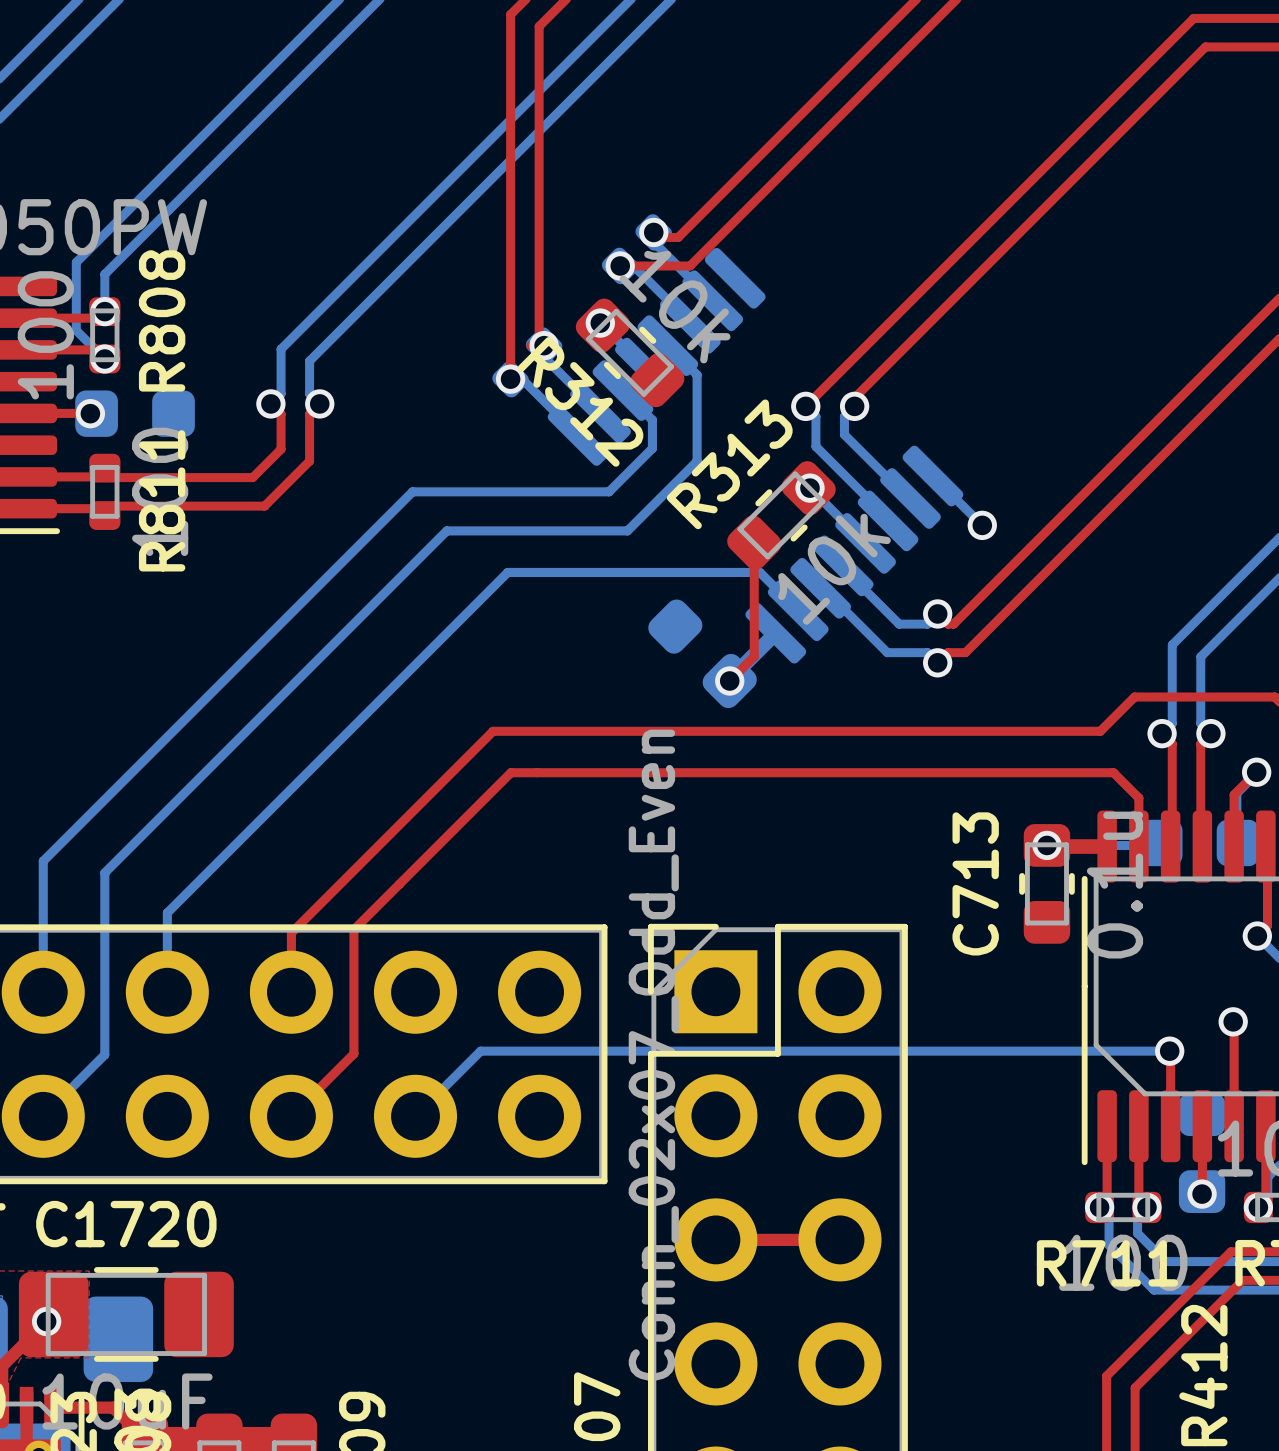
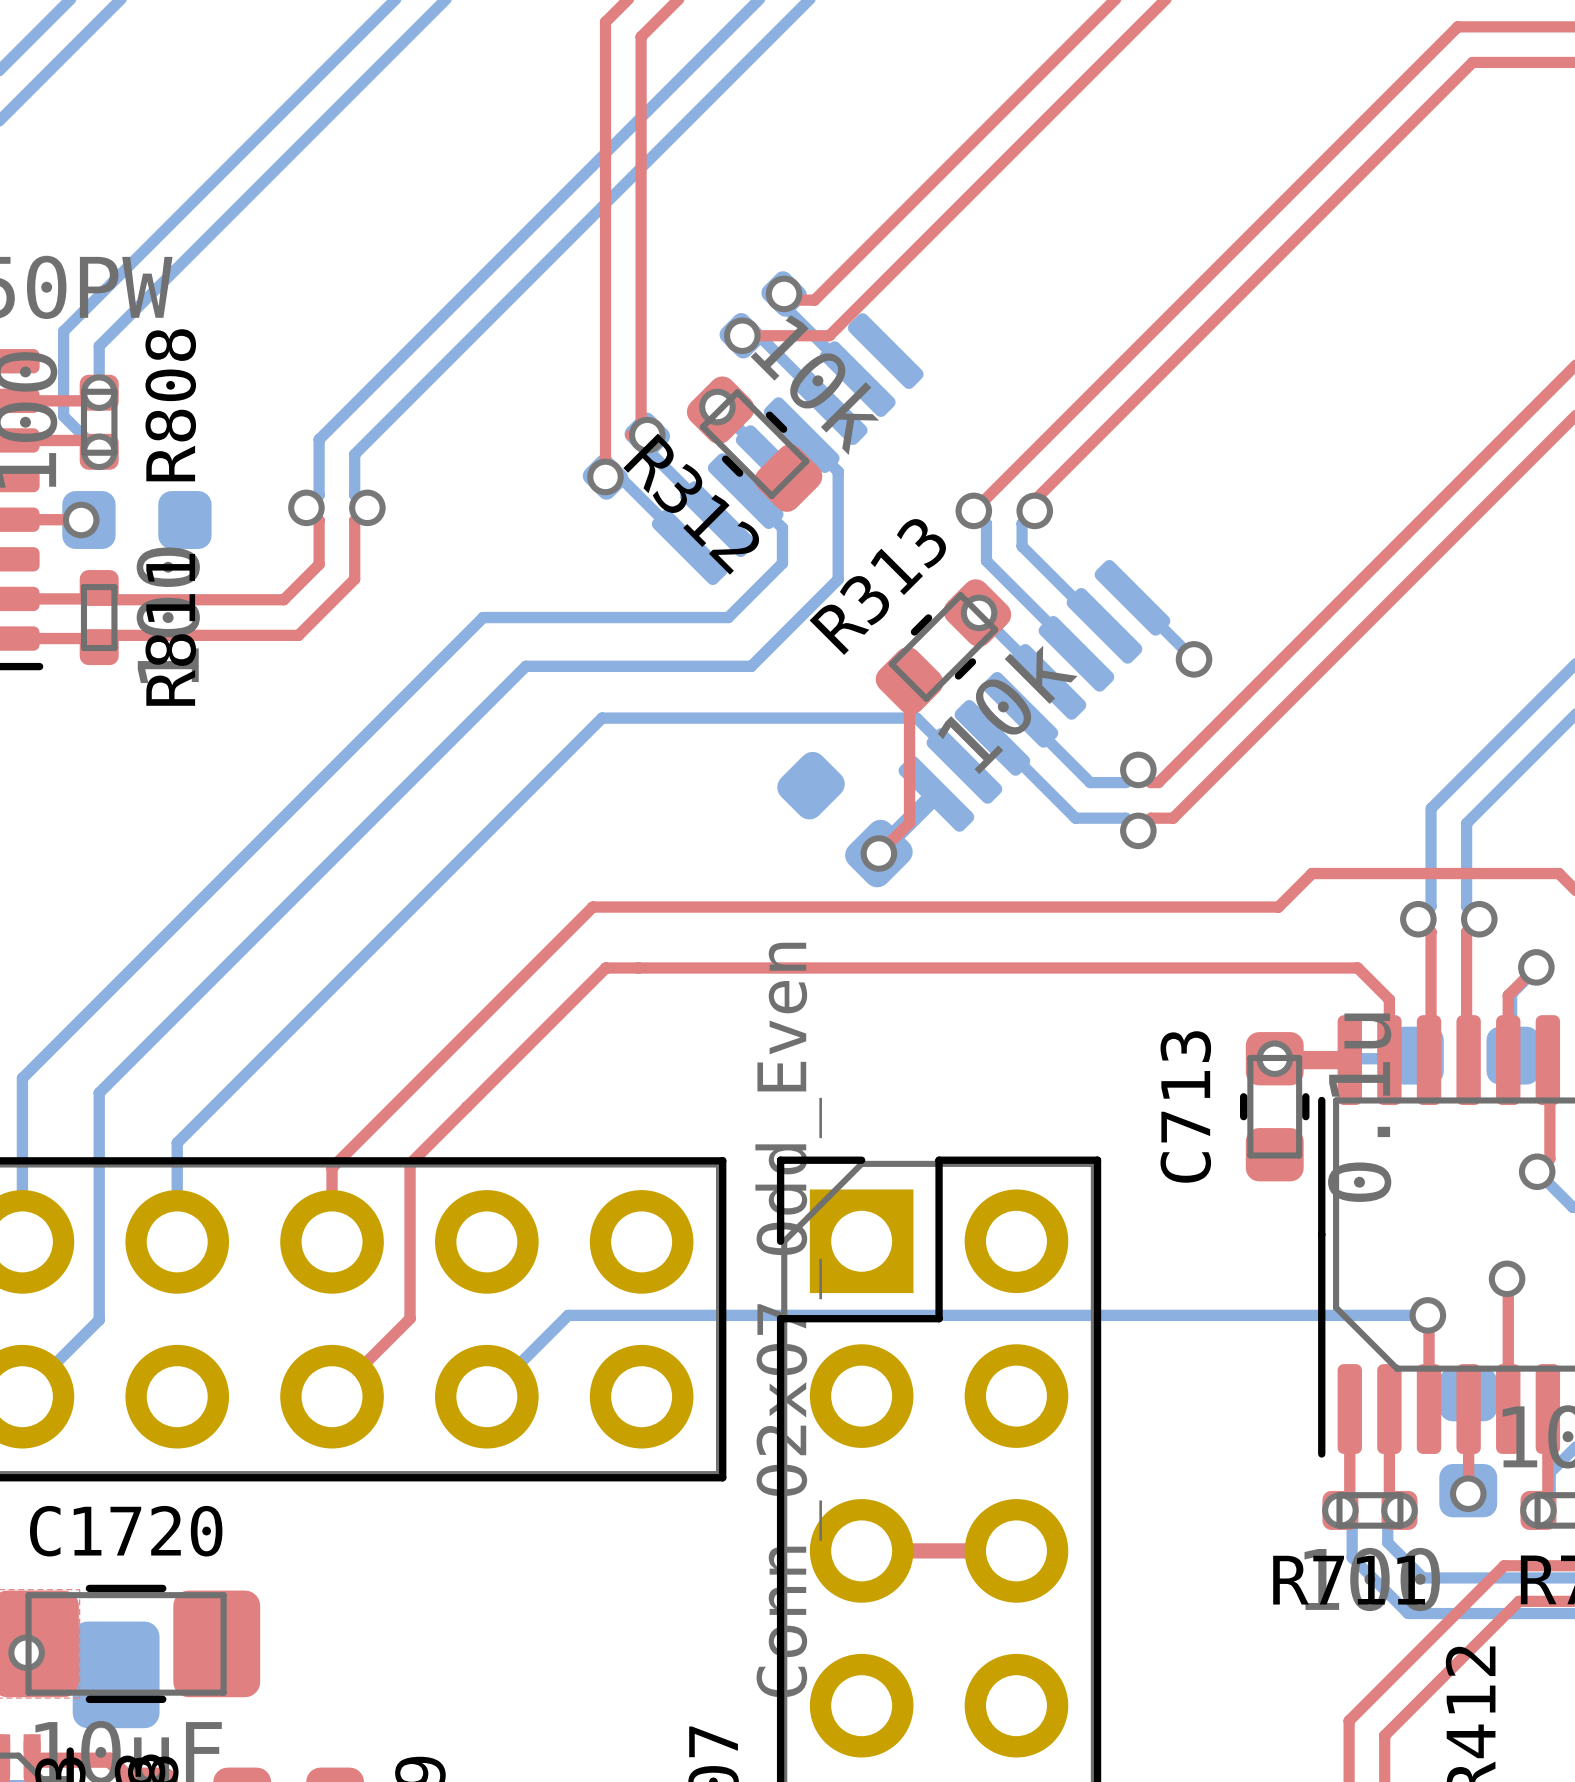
top track: (1134, 697) (1100, 731) (493, 731) -> (1384, 873) (1312, 873) (1278, 907) (592, 907) (583, 916)

